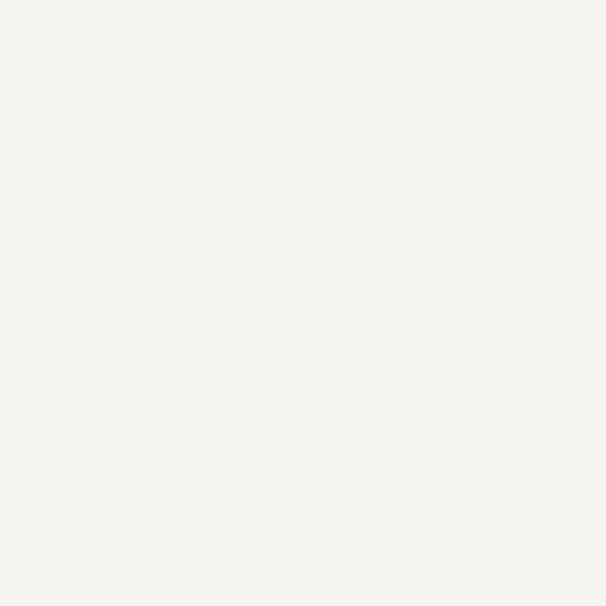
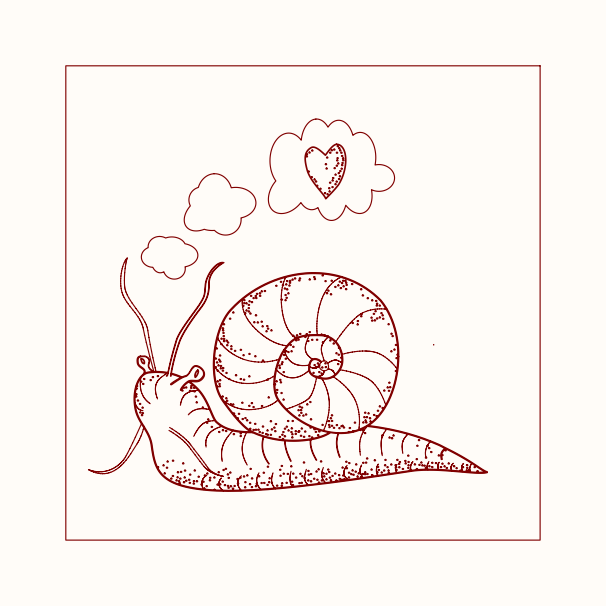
part: none -> (302, 302)

